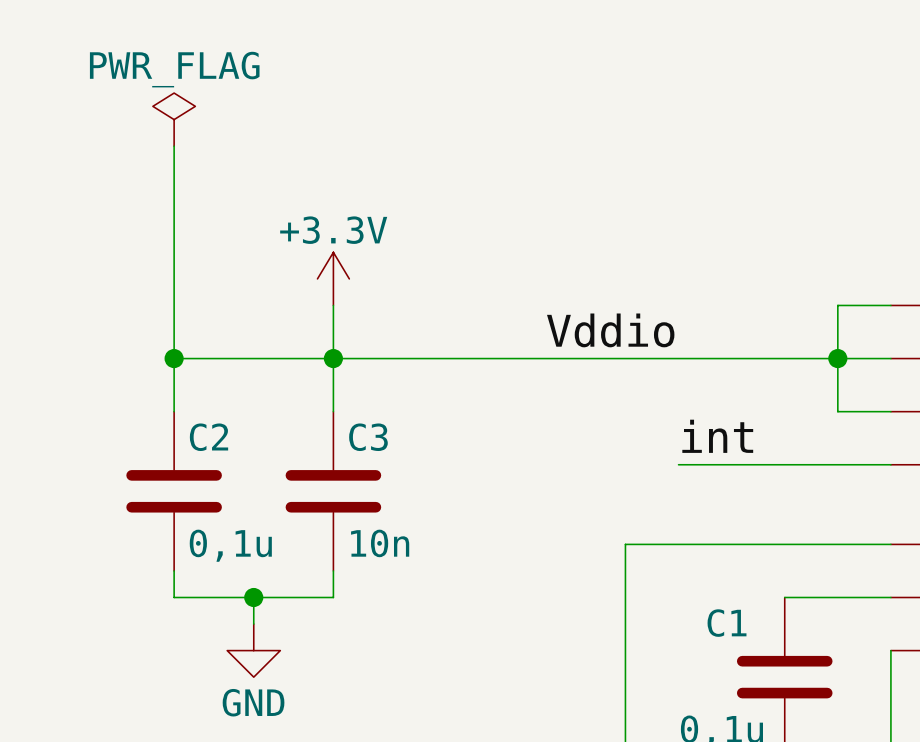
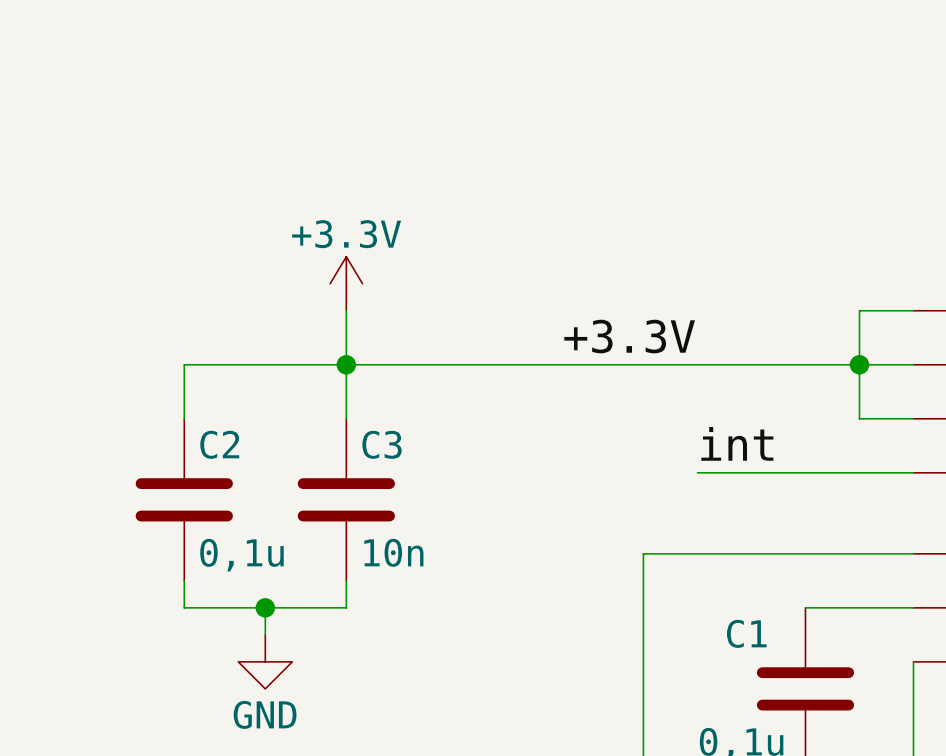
power symbol: PWR_FLAG (174, 119) -> none
wire: (174, 146) (174, 358) -> none
label: Vddio (610, 330) -> +3.3V (629, 336)
junction: (174, 358) -> none

